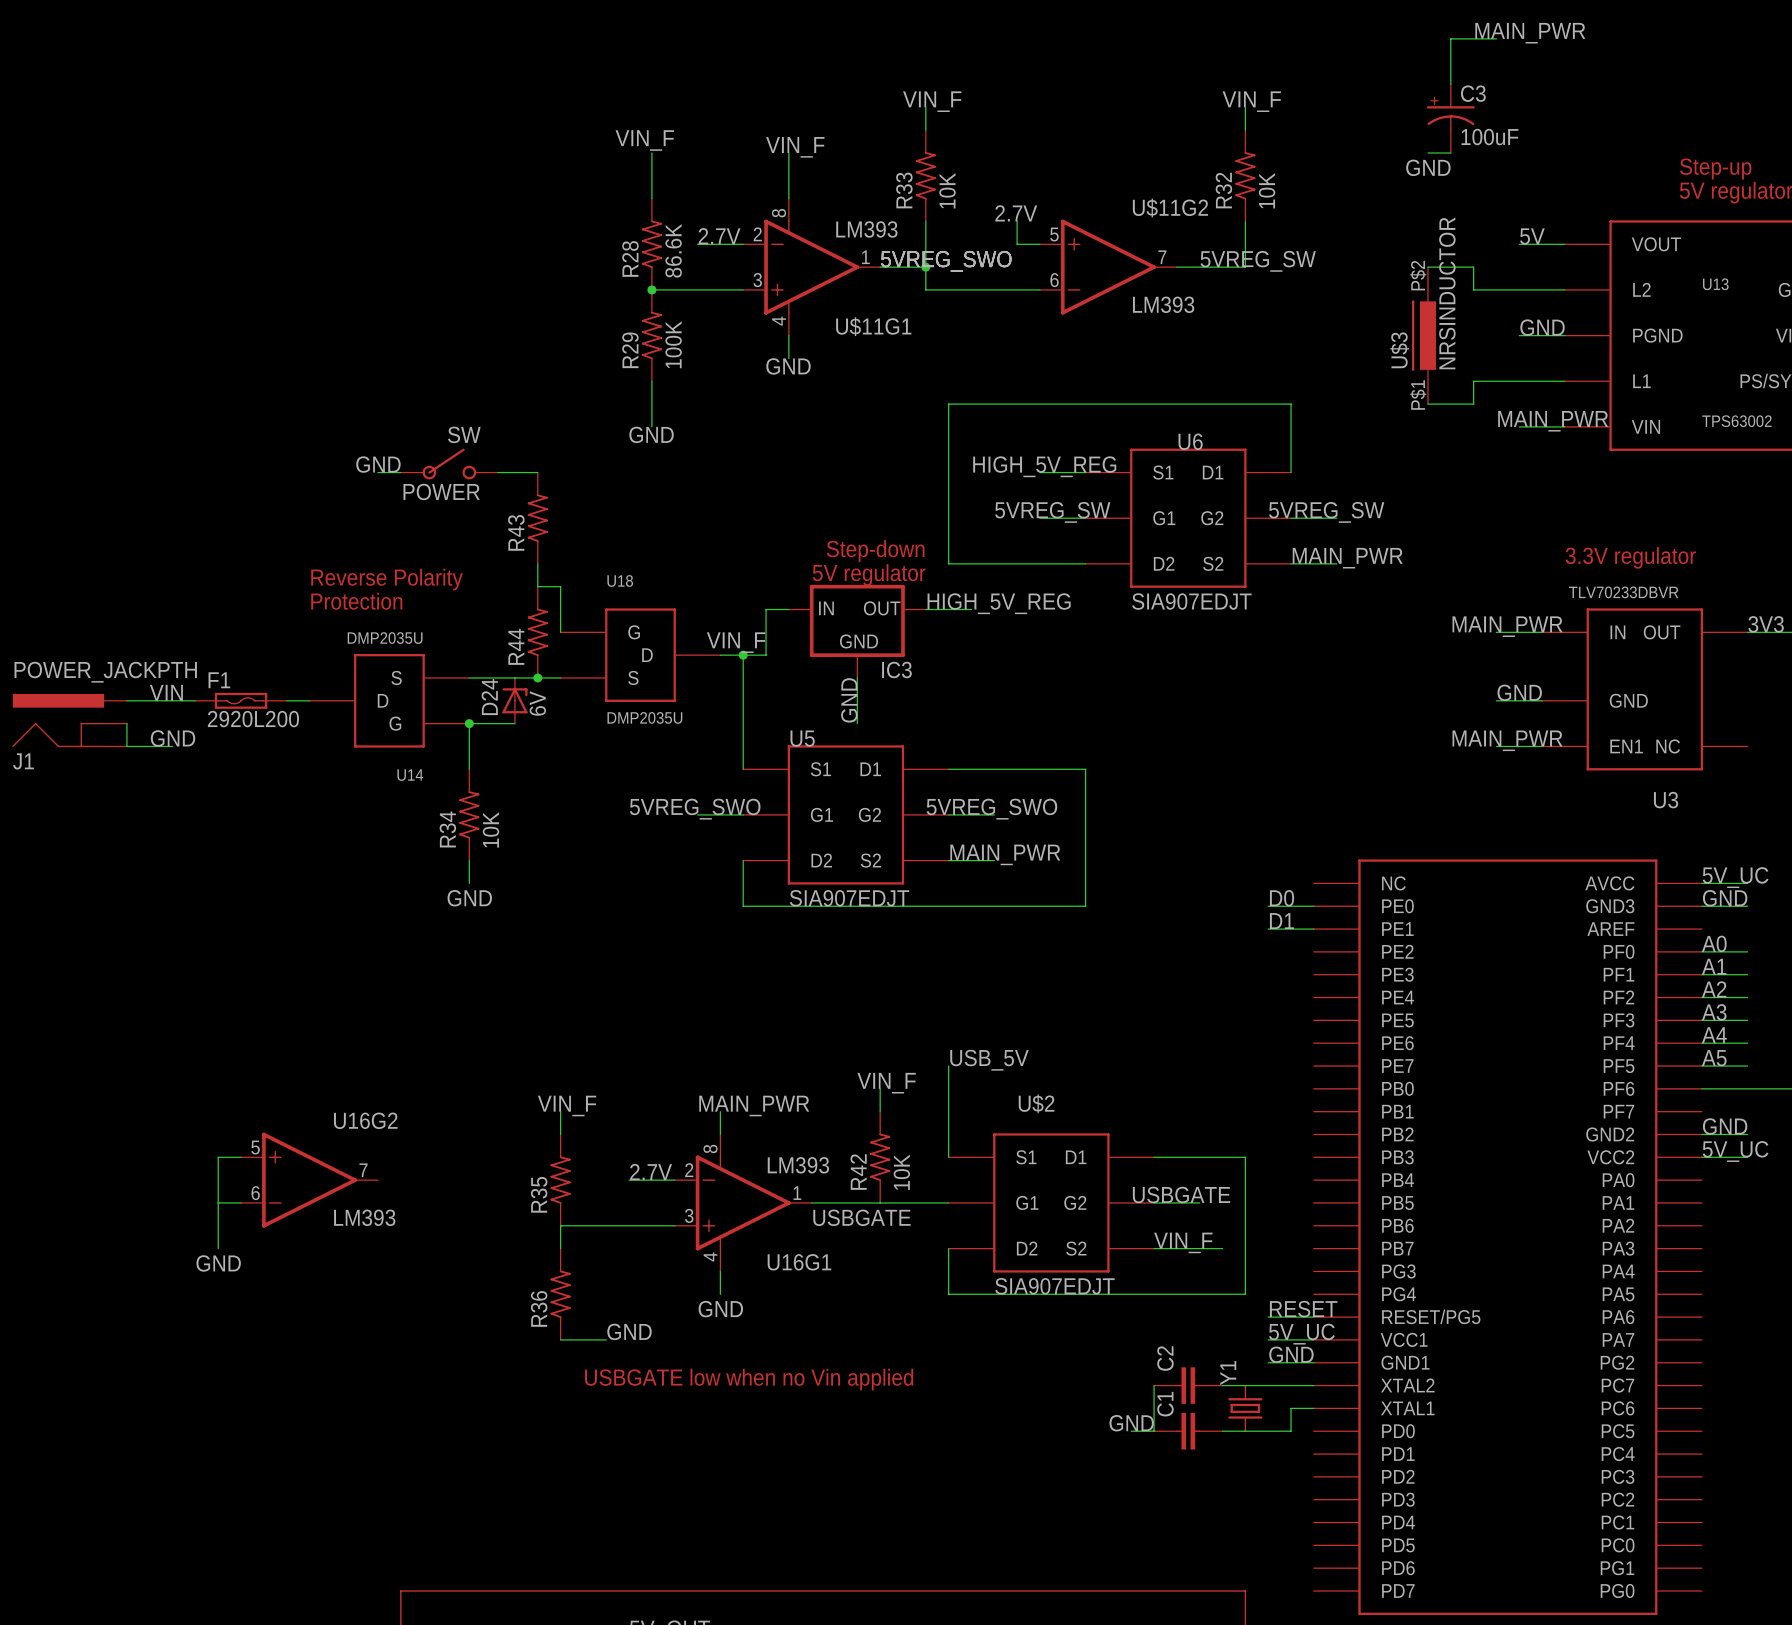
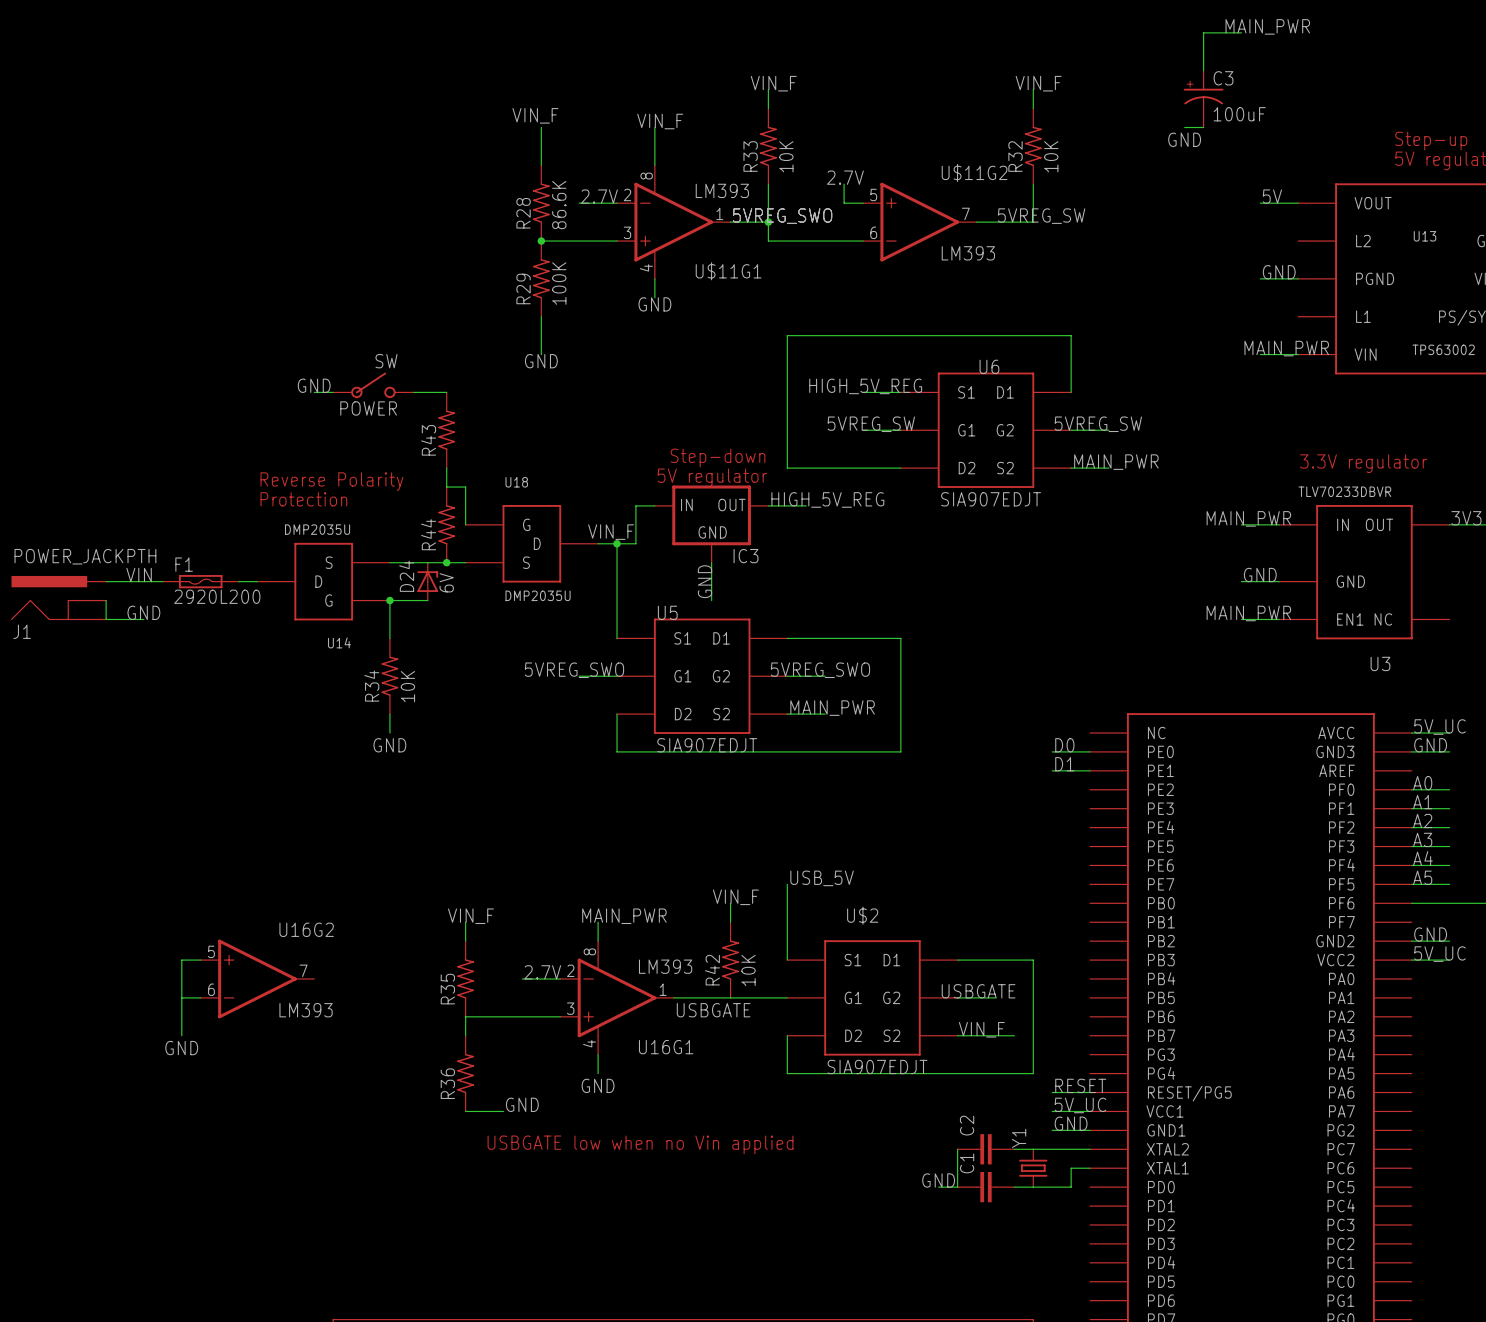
wire: (1427, 267) (1473, 267) (1473, 289) (1564, 289) -> none
U$3: NRSINDUCTOR (1423, 335) -> none
wire: (1564, 381) (1473, 381) (1473, 404) (1427, 404) -> none

